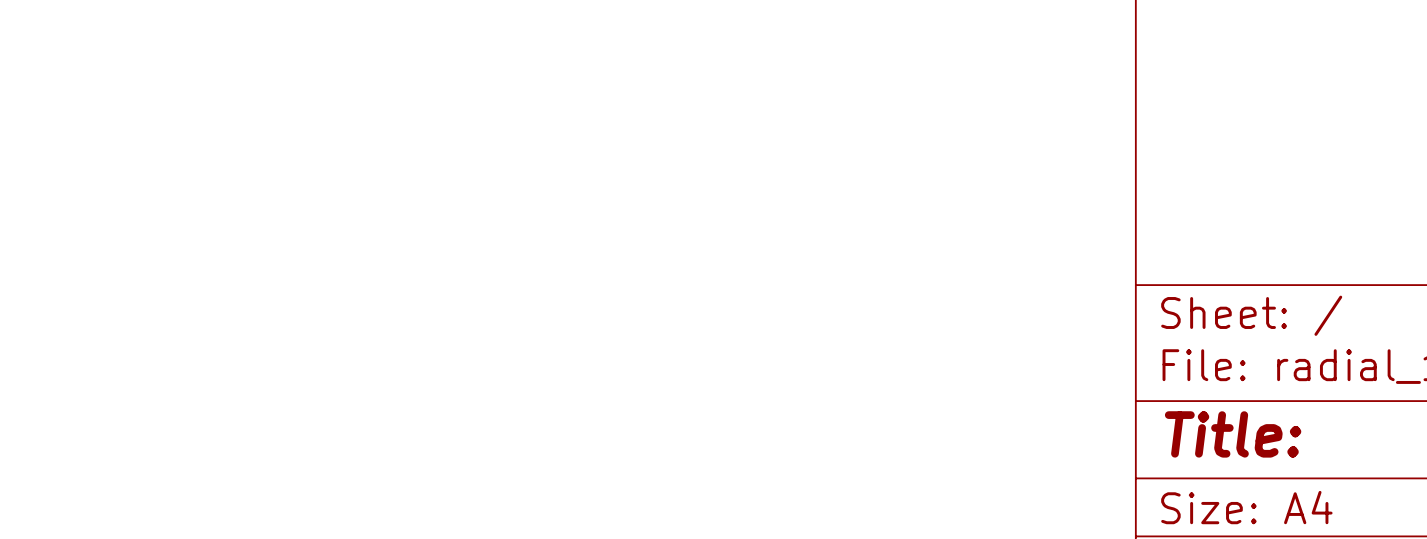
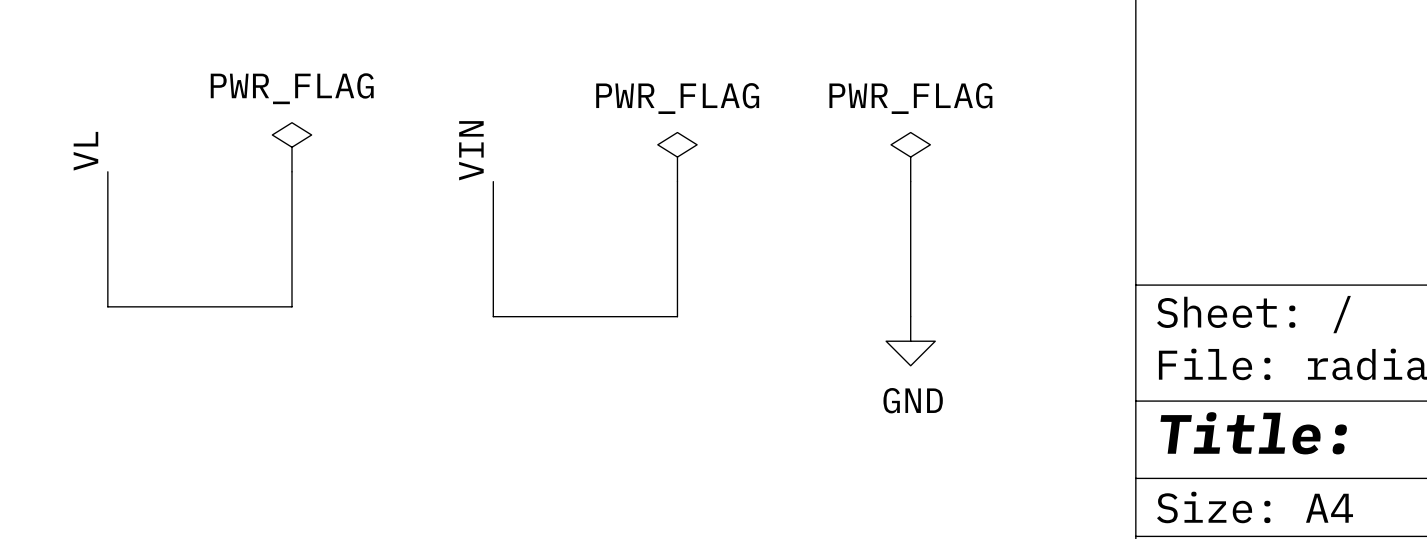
power symbol: none -> PWR_FLAG (291, 147)
label: none -> VL (85, 151)
label: none -> VIN (471, 150)
power symbol: none -> PWR_FLAG (677, 157)
power symbol: none -> PWR_FLAG (910, 157)
wire: none -> (107, 171) (107, 306) (291, 306) (291, 171)
wire: none -> (493, 181) (493, 316) (677, 316) (677, 181)
wire: none -> (910, 181) (910, 316)
power symbol: none -> GND (910, 341)

